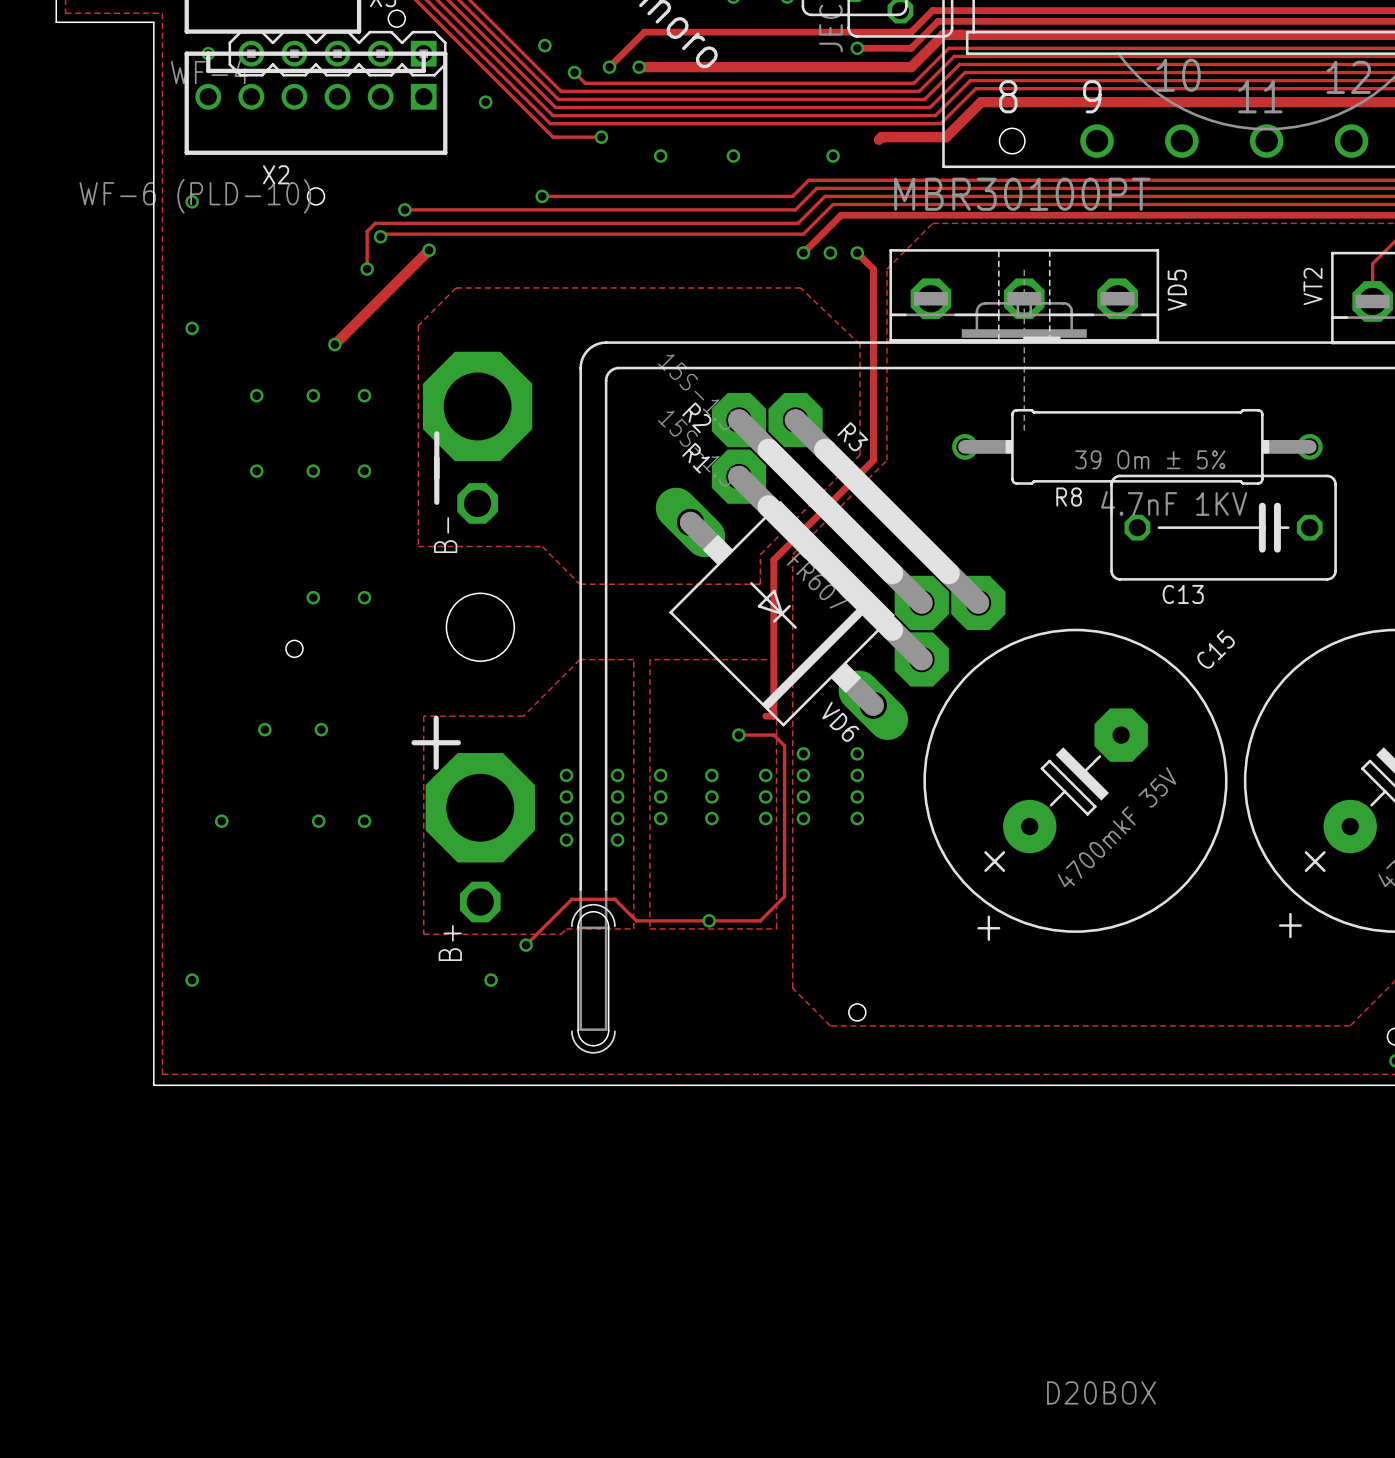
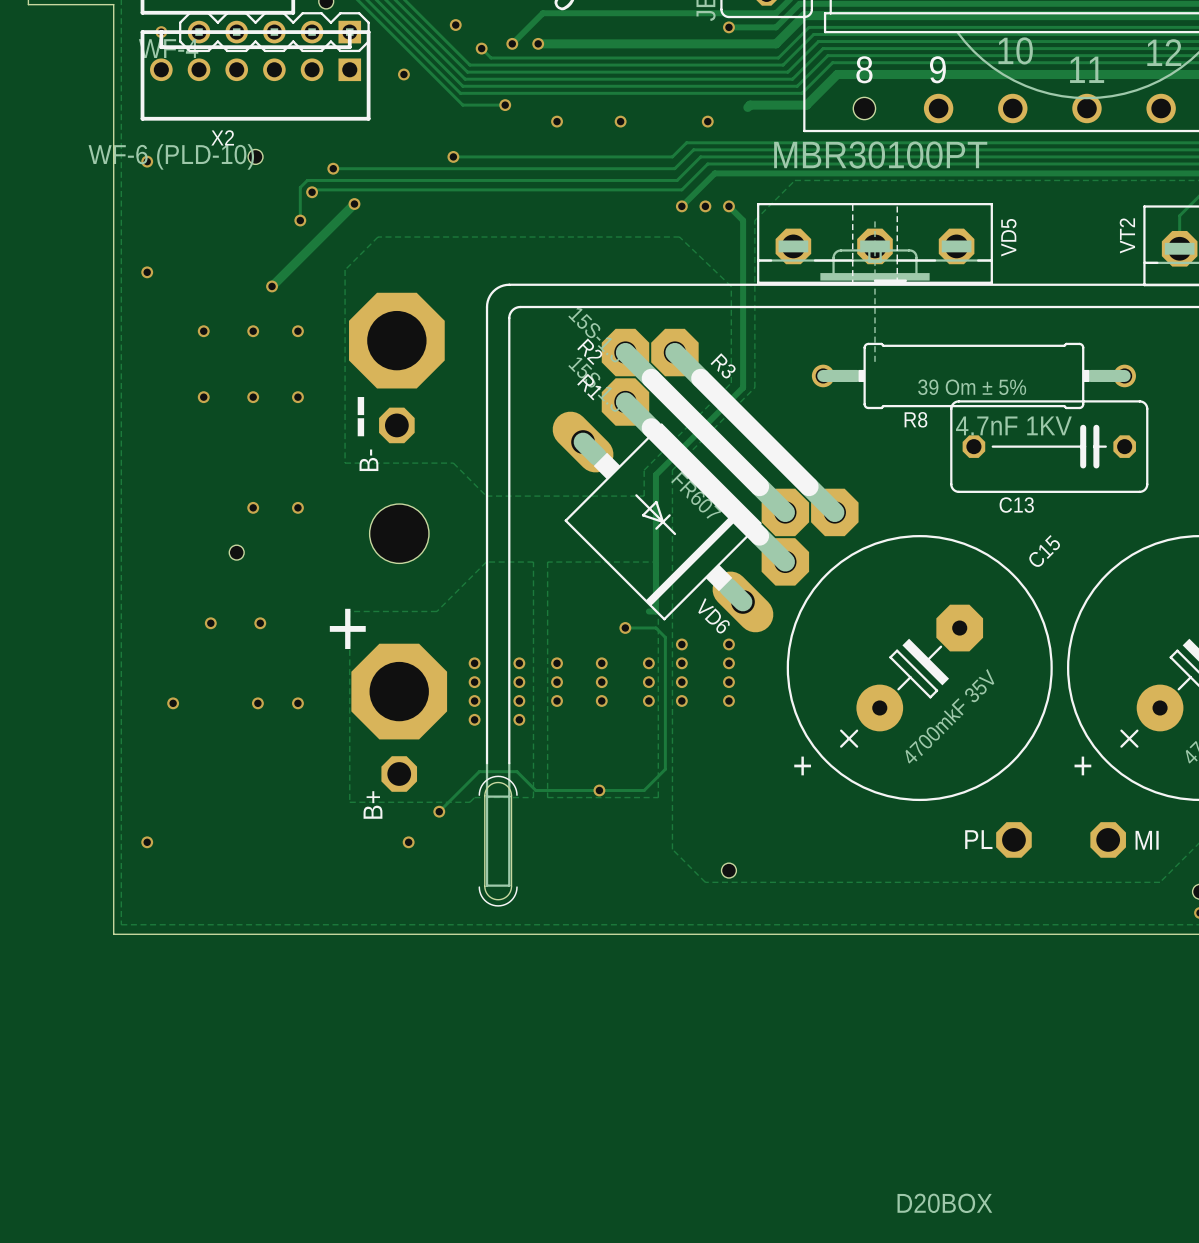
text position: + (1290, 925) -> + (1082, 765)
text position: + (988, 928) -> + (802, 765)
PL: none -> (1013, 839)
MI: none -> (1108, 839)

